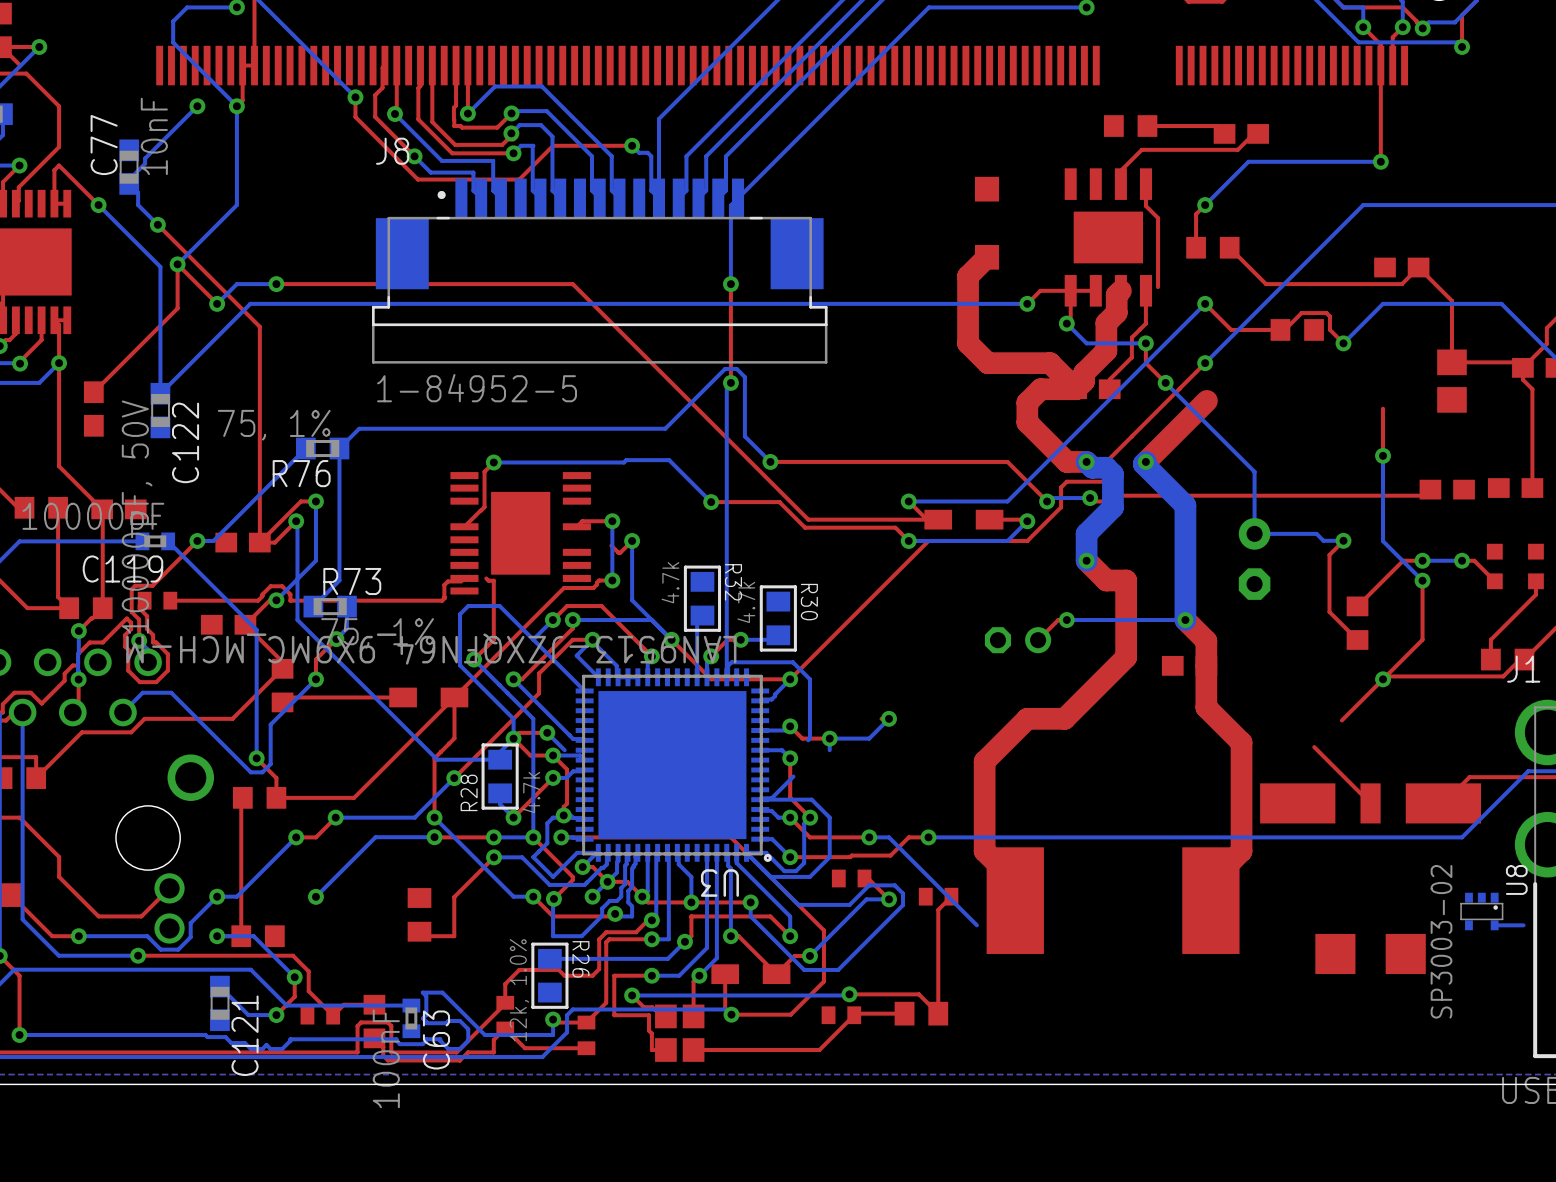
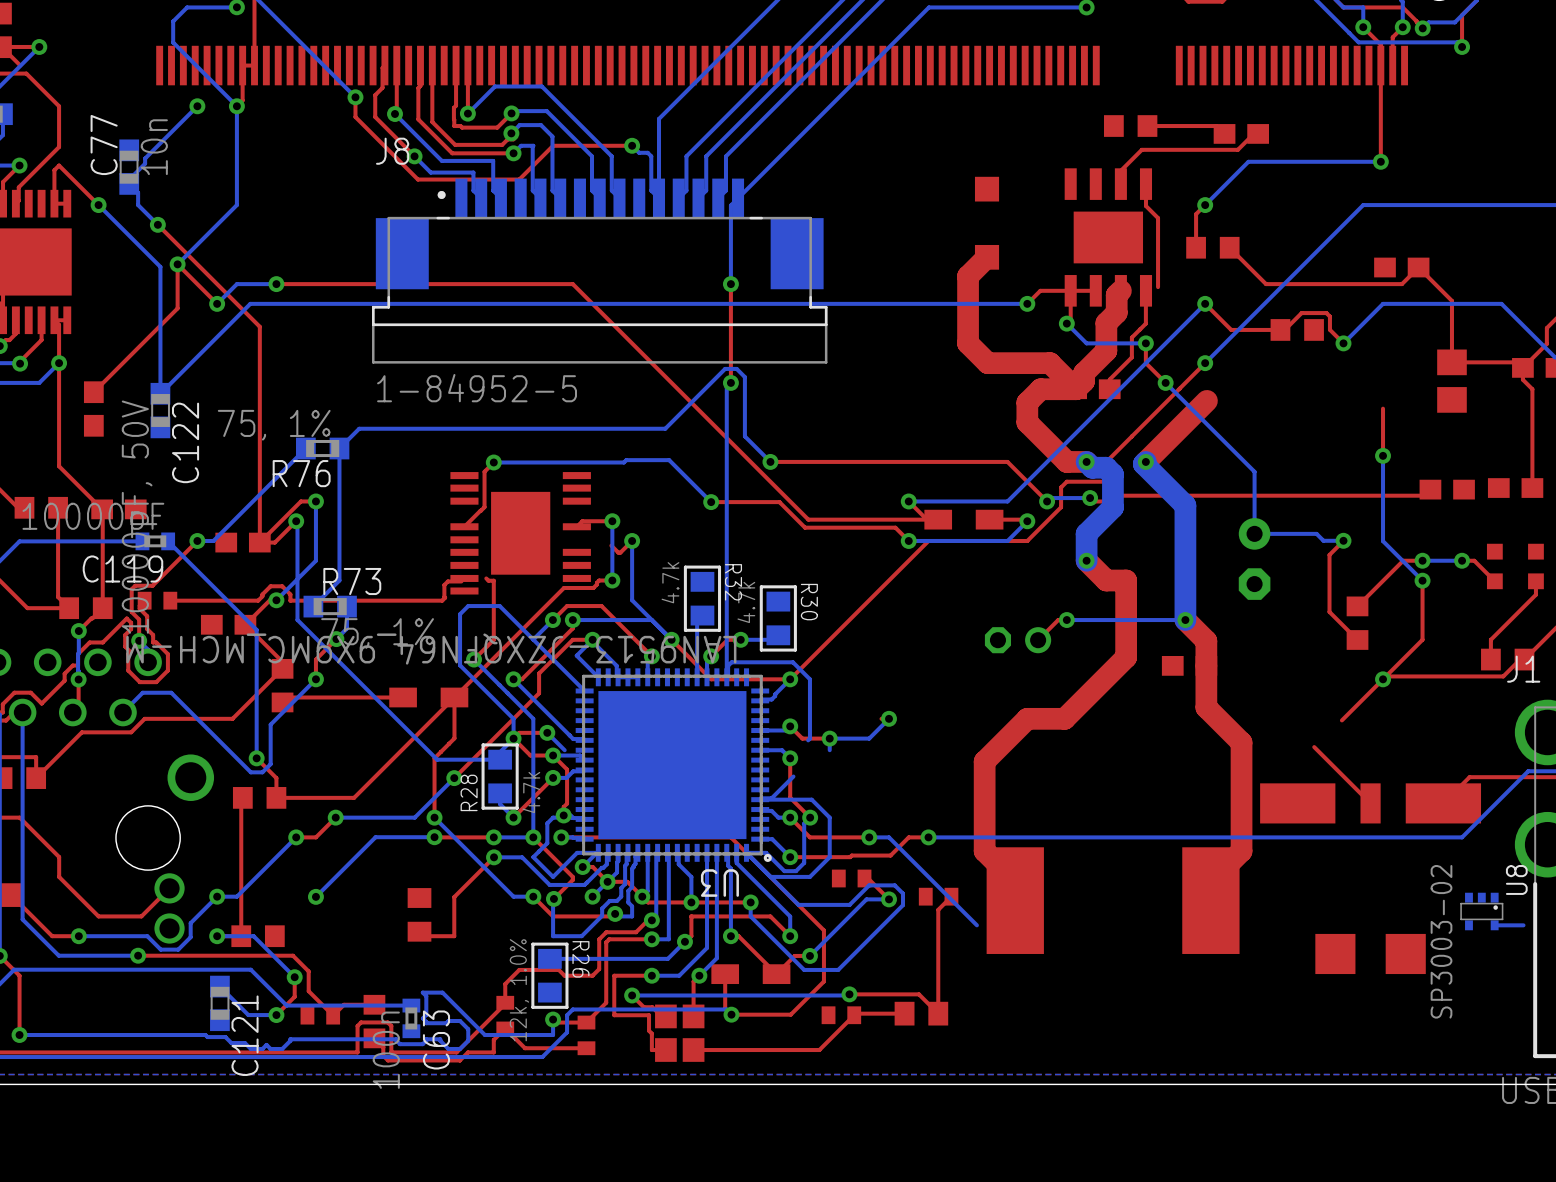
C77 value: 10nF (154, 136) -> 10n (154, 147)
C63 value: 100nF (386, 1058) -> 100n (386, 1050)

